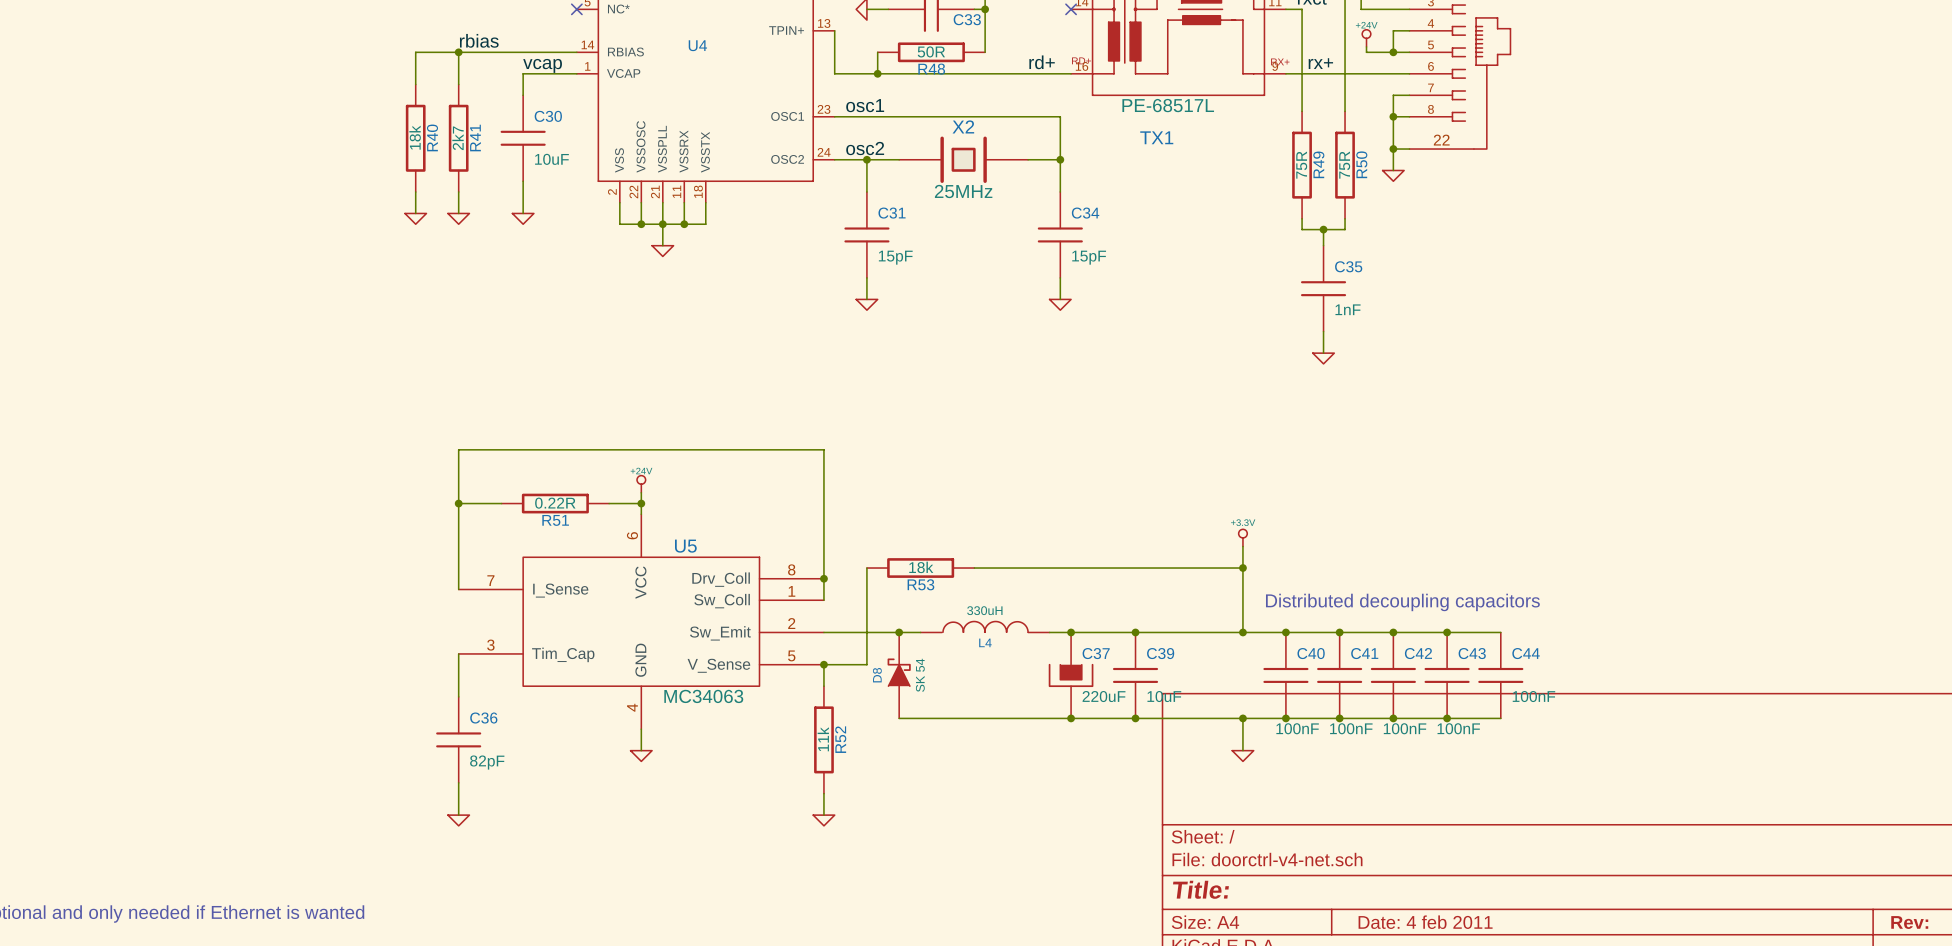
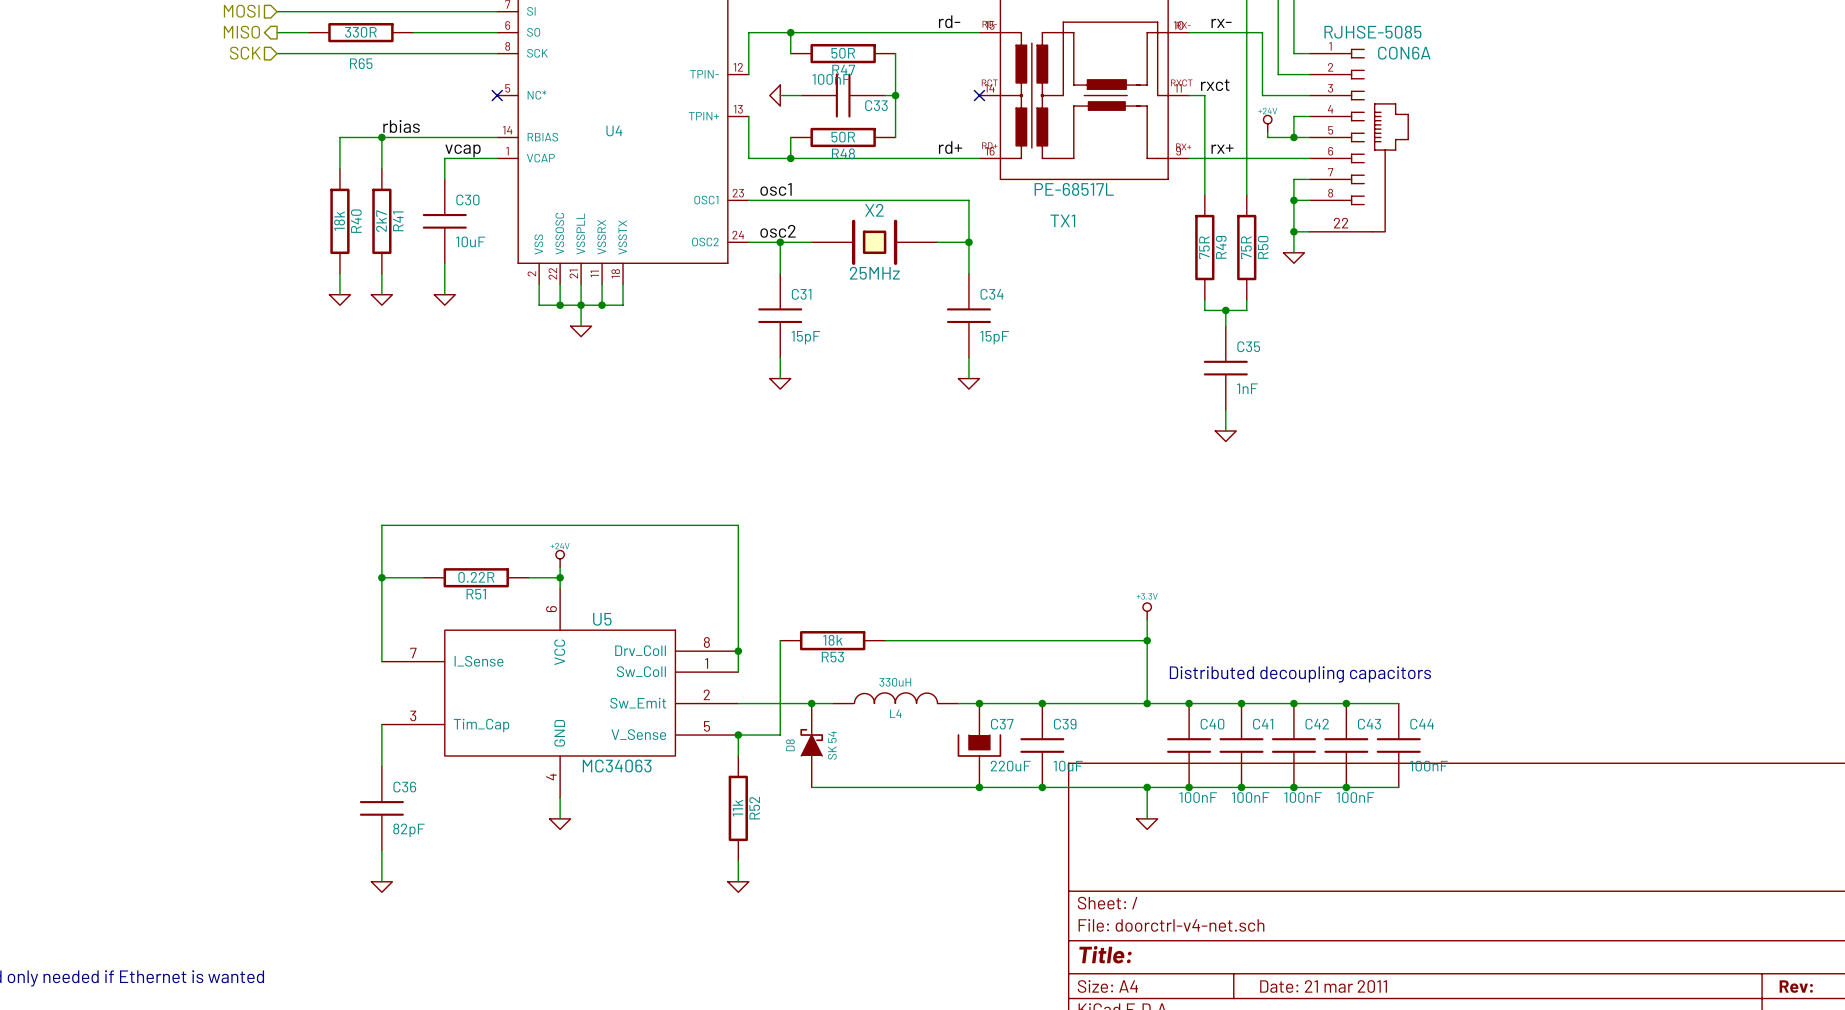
title block: Date: 4 feb 2011 (1425, 922) -> Date: 21 mar 2011 (1323, 986)

